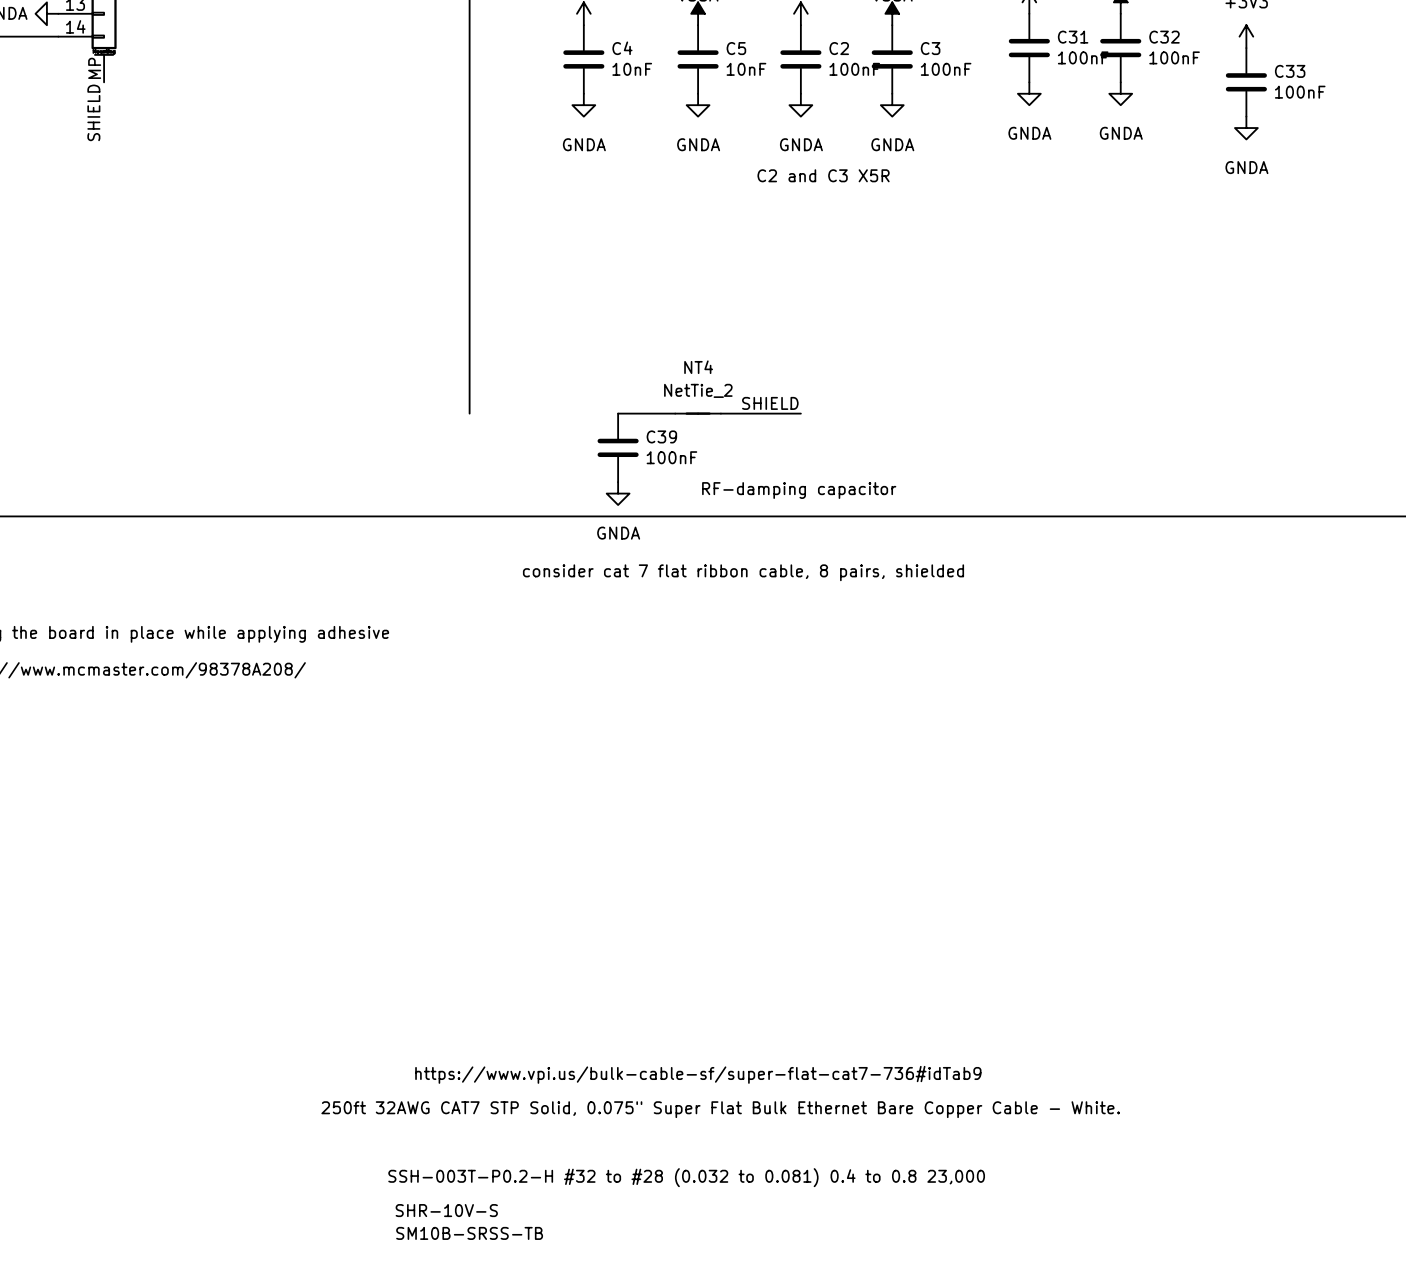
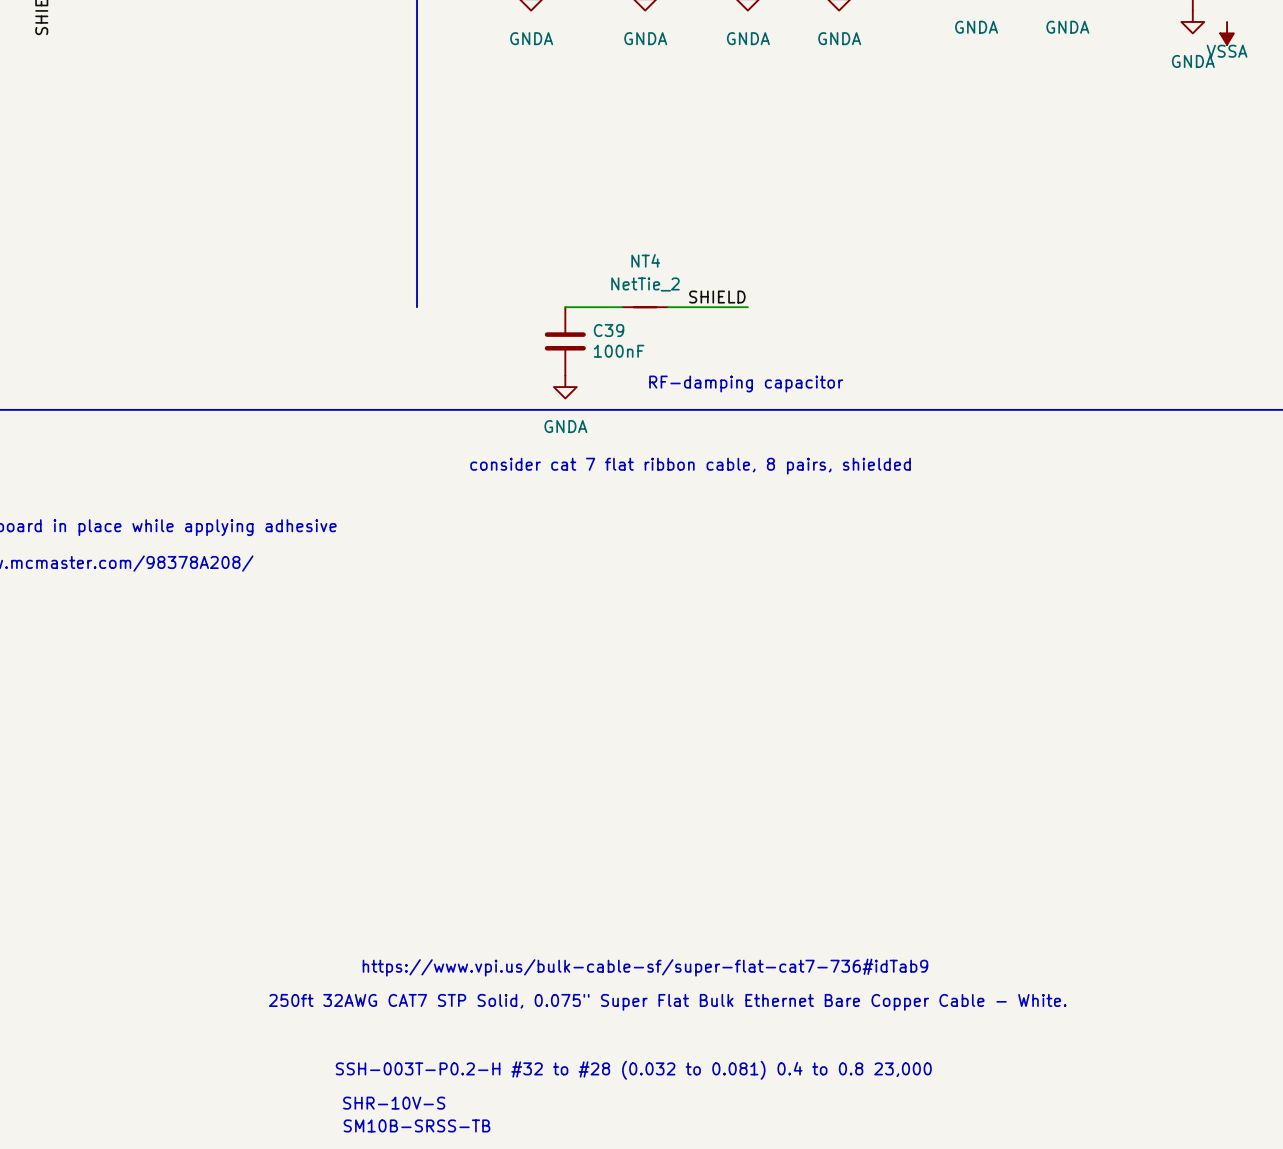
power symbol: none -> VSSA (1227, 33)
text: C2 and C3 X5R (823, 175) -> none

